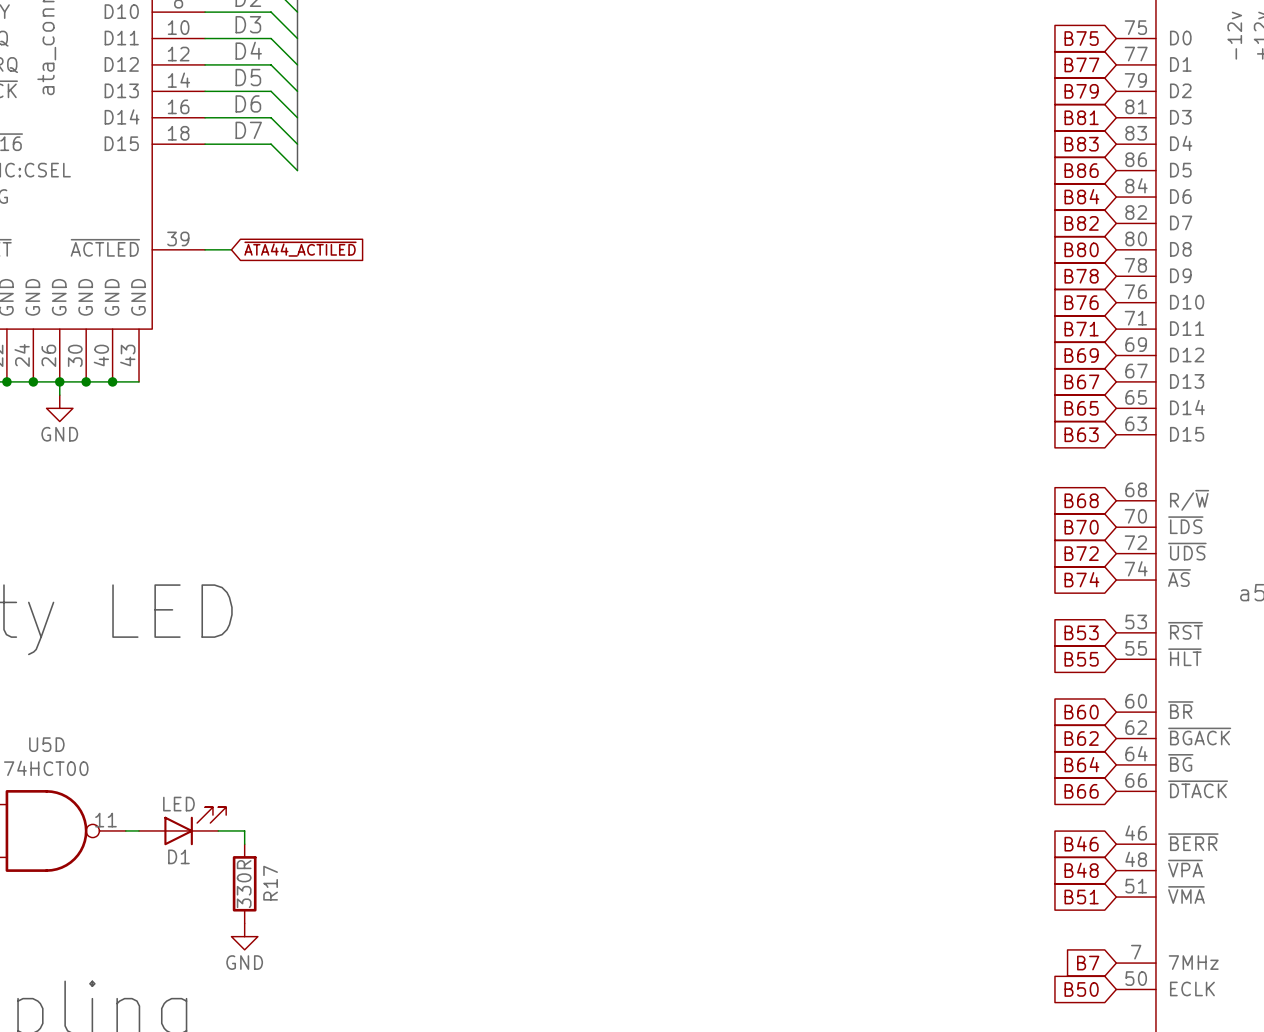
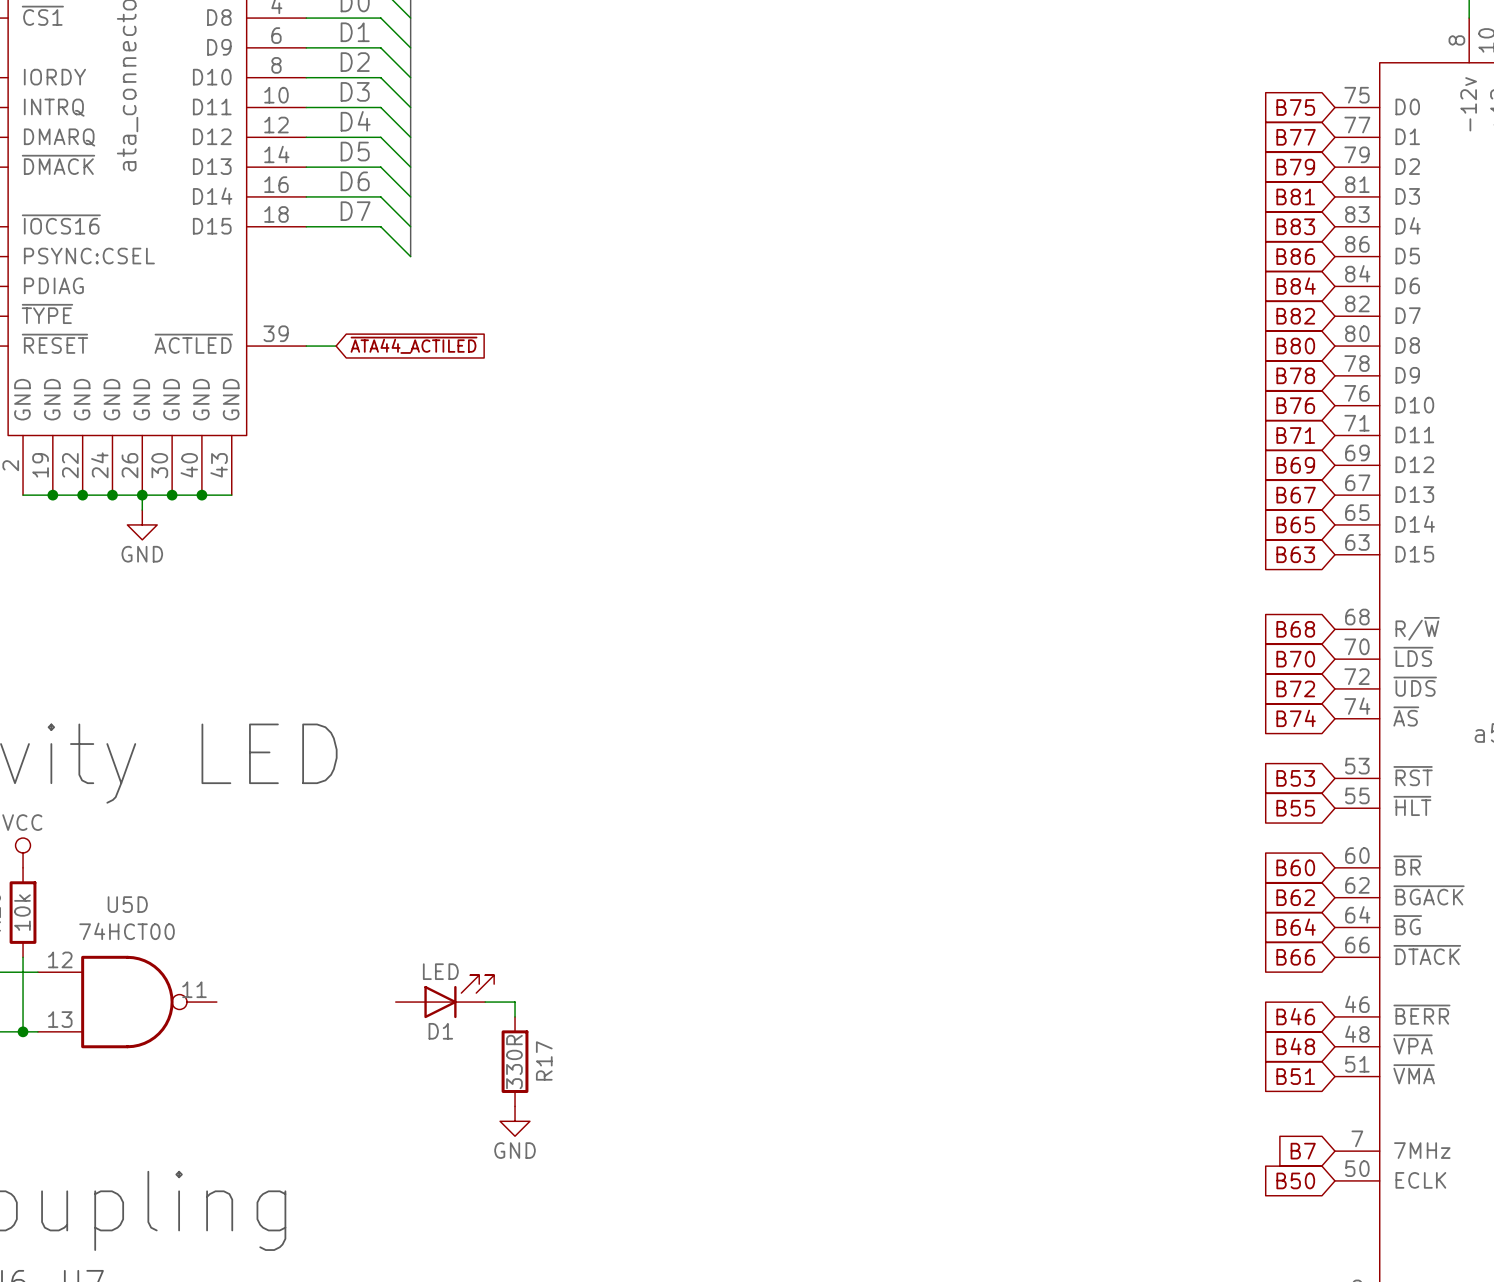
D1 position: (182, 826) -> (444, 996)
wire: (125, 830) (139, 830) -> none
wire: (218, 830) (244, 830) (244, 844) -> (485, 1002) (515, 1002) (515, 1016)
R17 position: (244, 883) -> (515, 1061)
power symbol position: GND (244, 936) -> GND (515, 1121)

